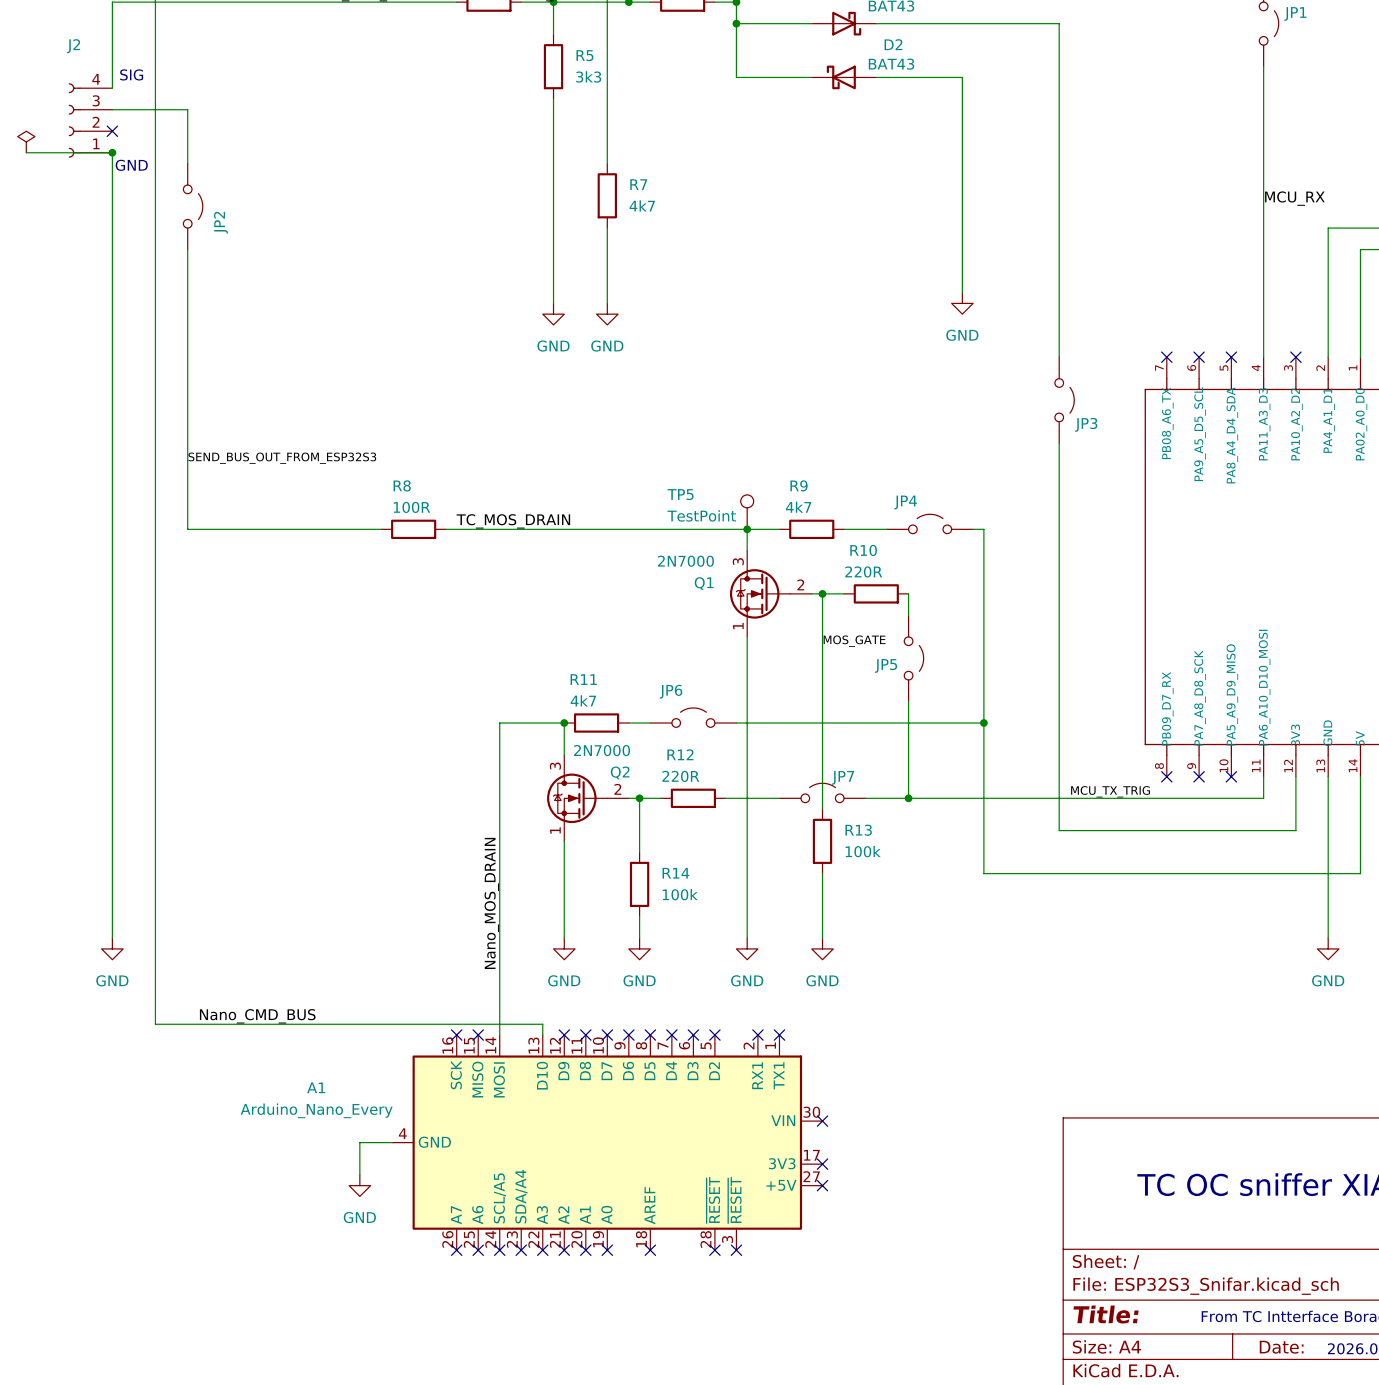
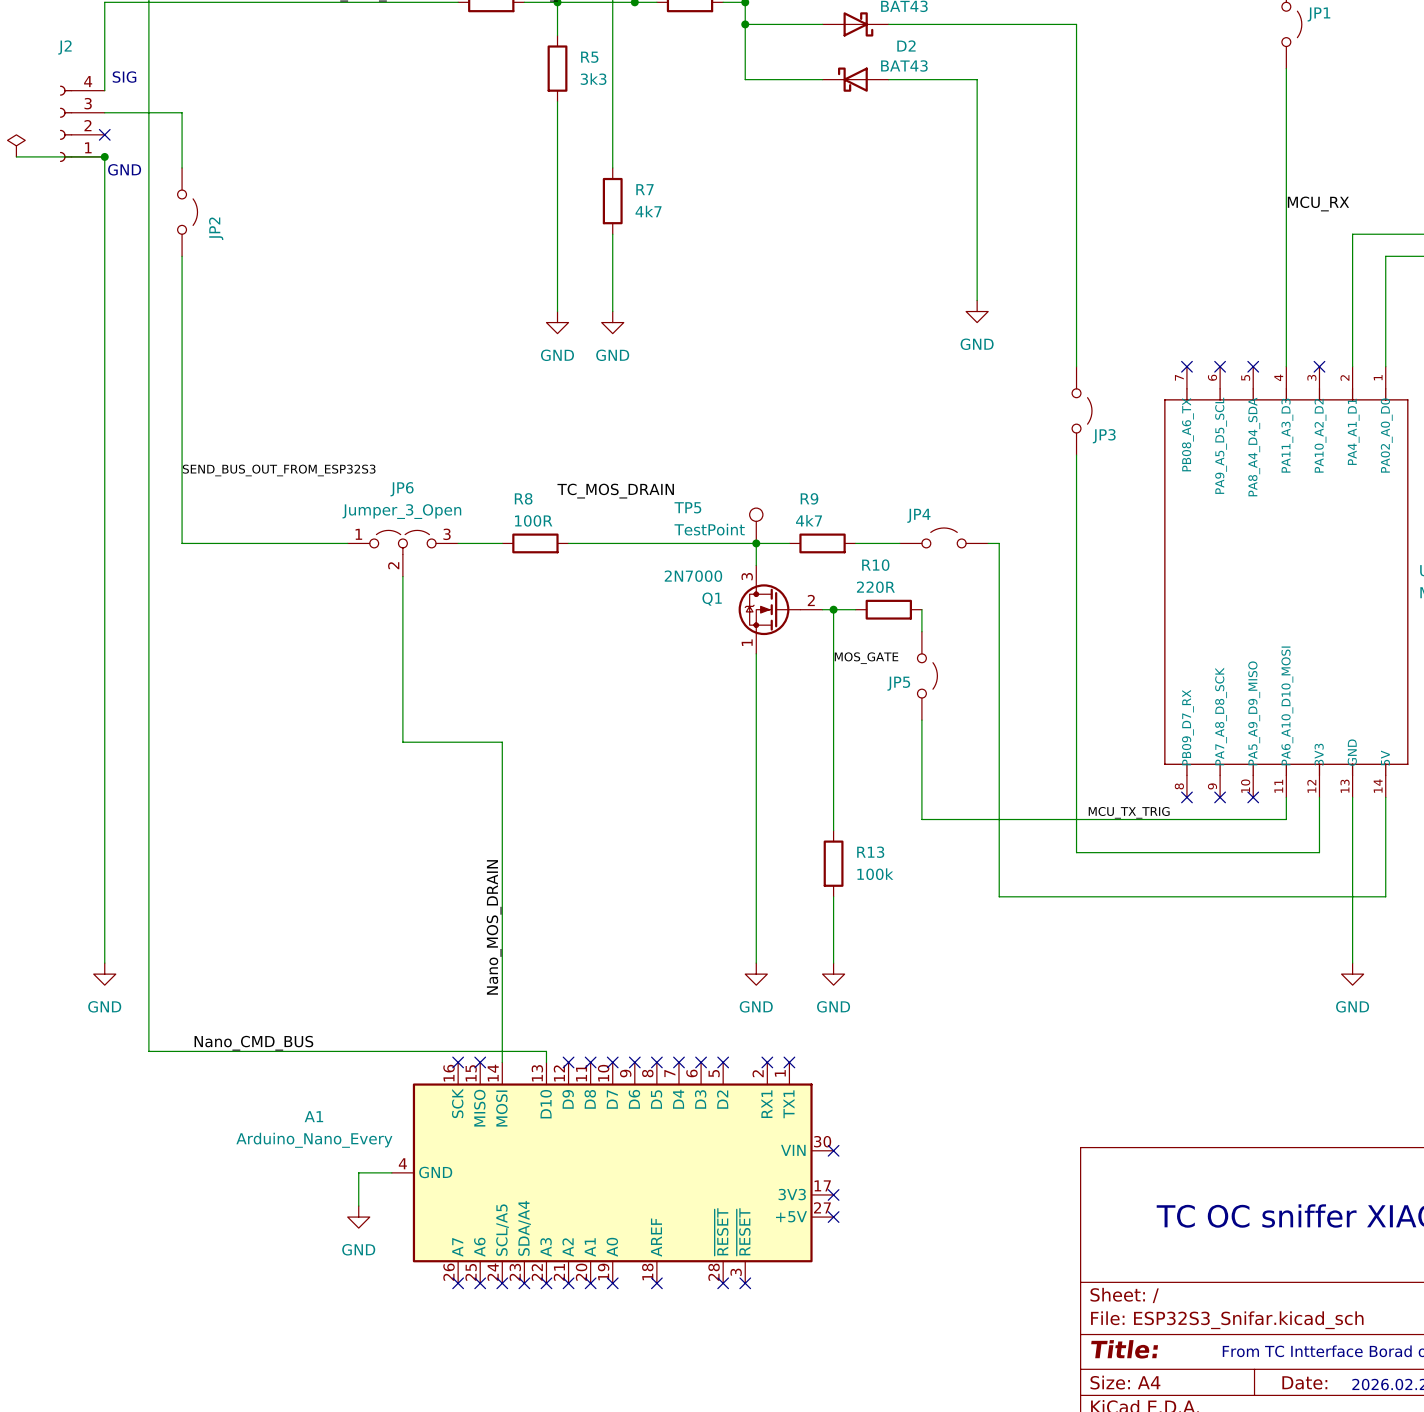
JP6 value: none -> Jumper_3_Open (401, 511)
label position: TC_MOS_DRAIN (513, 521) -> TC_MOS_DRAIN (615, 491)
R8 position: (413, 529) -> (535, 543)
wire: (499, 529) (564, 529) -> none
JP6 name position: JP6 (671, 691) -> JP6 (402, 489)
JP6 symbol: [650, 707, 737, 728] -> [347, 530, 459, 577]
wire: (499, 723) (564, 723) (564, 755) -> (502, 742) (402, 742) (402, 576)
junction: (564, 723) -> none
R11: 4k7 (596, 723) -> none
wire: (628, 723) (650, 723) -> none
wire: (736, 723) (983, 723) -> none
junction: (983, 723) -> none
JP7: (822, 792) -> none
Q2: 2N7000 (587, 798) -> none
wire: (628, 798) (661, 798) -> none
wire: (639, 798) (639, 852) -> none
junction: (639, 798) -> none
R12: 220R (693, 798) -> none
wire: (725, 798) (779, 798) -> none
wire: (865, 798) (908, 798) -> none
junction: (908, 798) -> none
wire: (564, 841) (564, 938) -> none
R14: 100k (639, 884) -> none
wire: (639, 916) (639, 938) -> none
power symbol: GND (564, 948) -> none
power symbol: GND (639, 948) -> none

